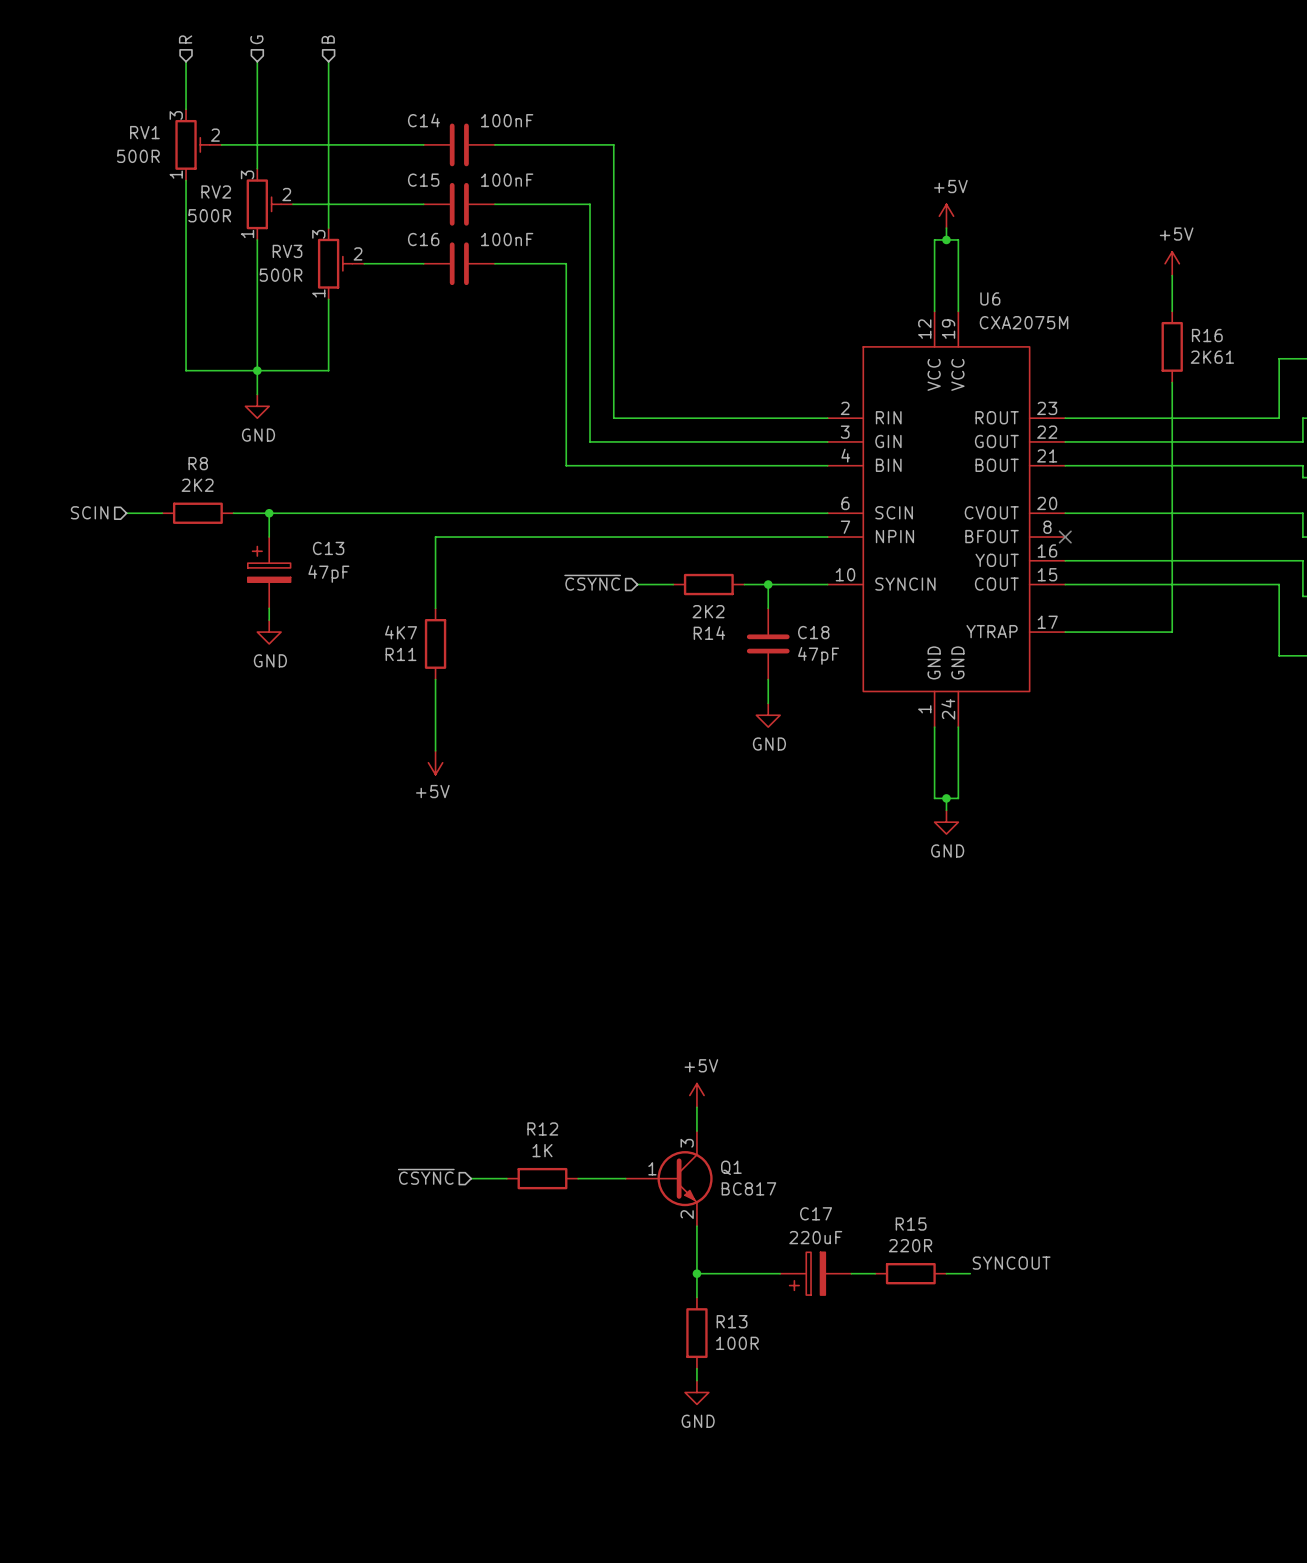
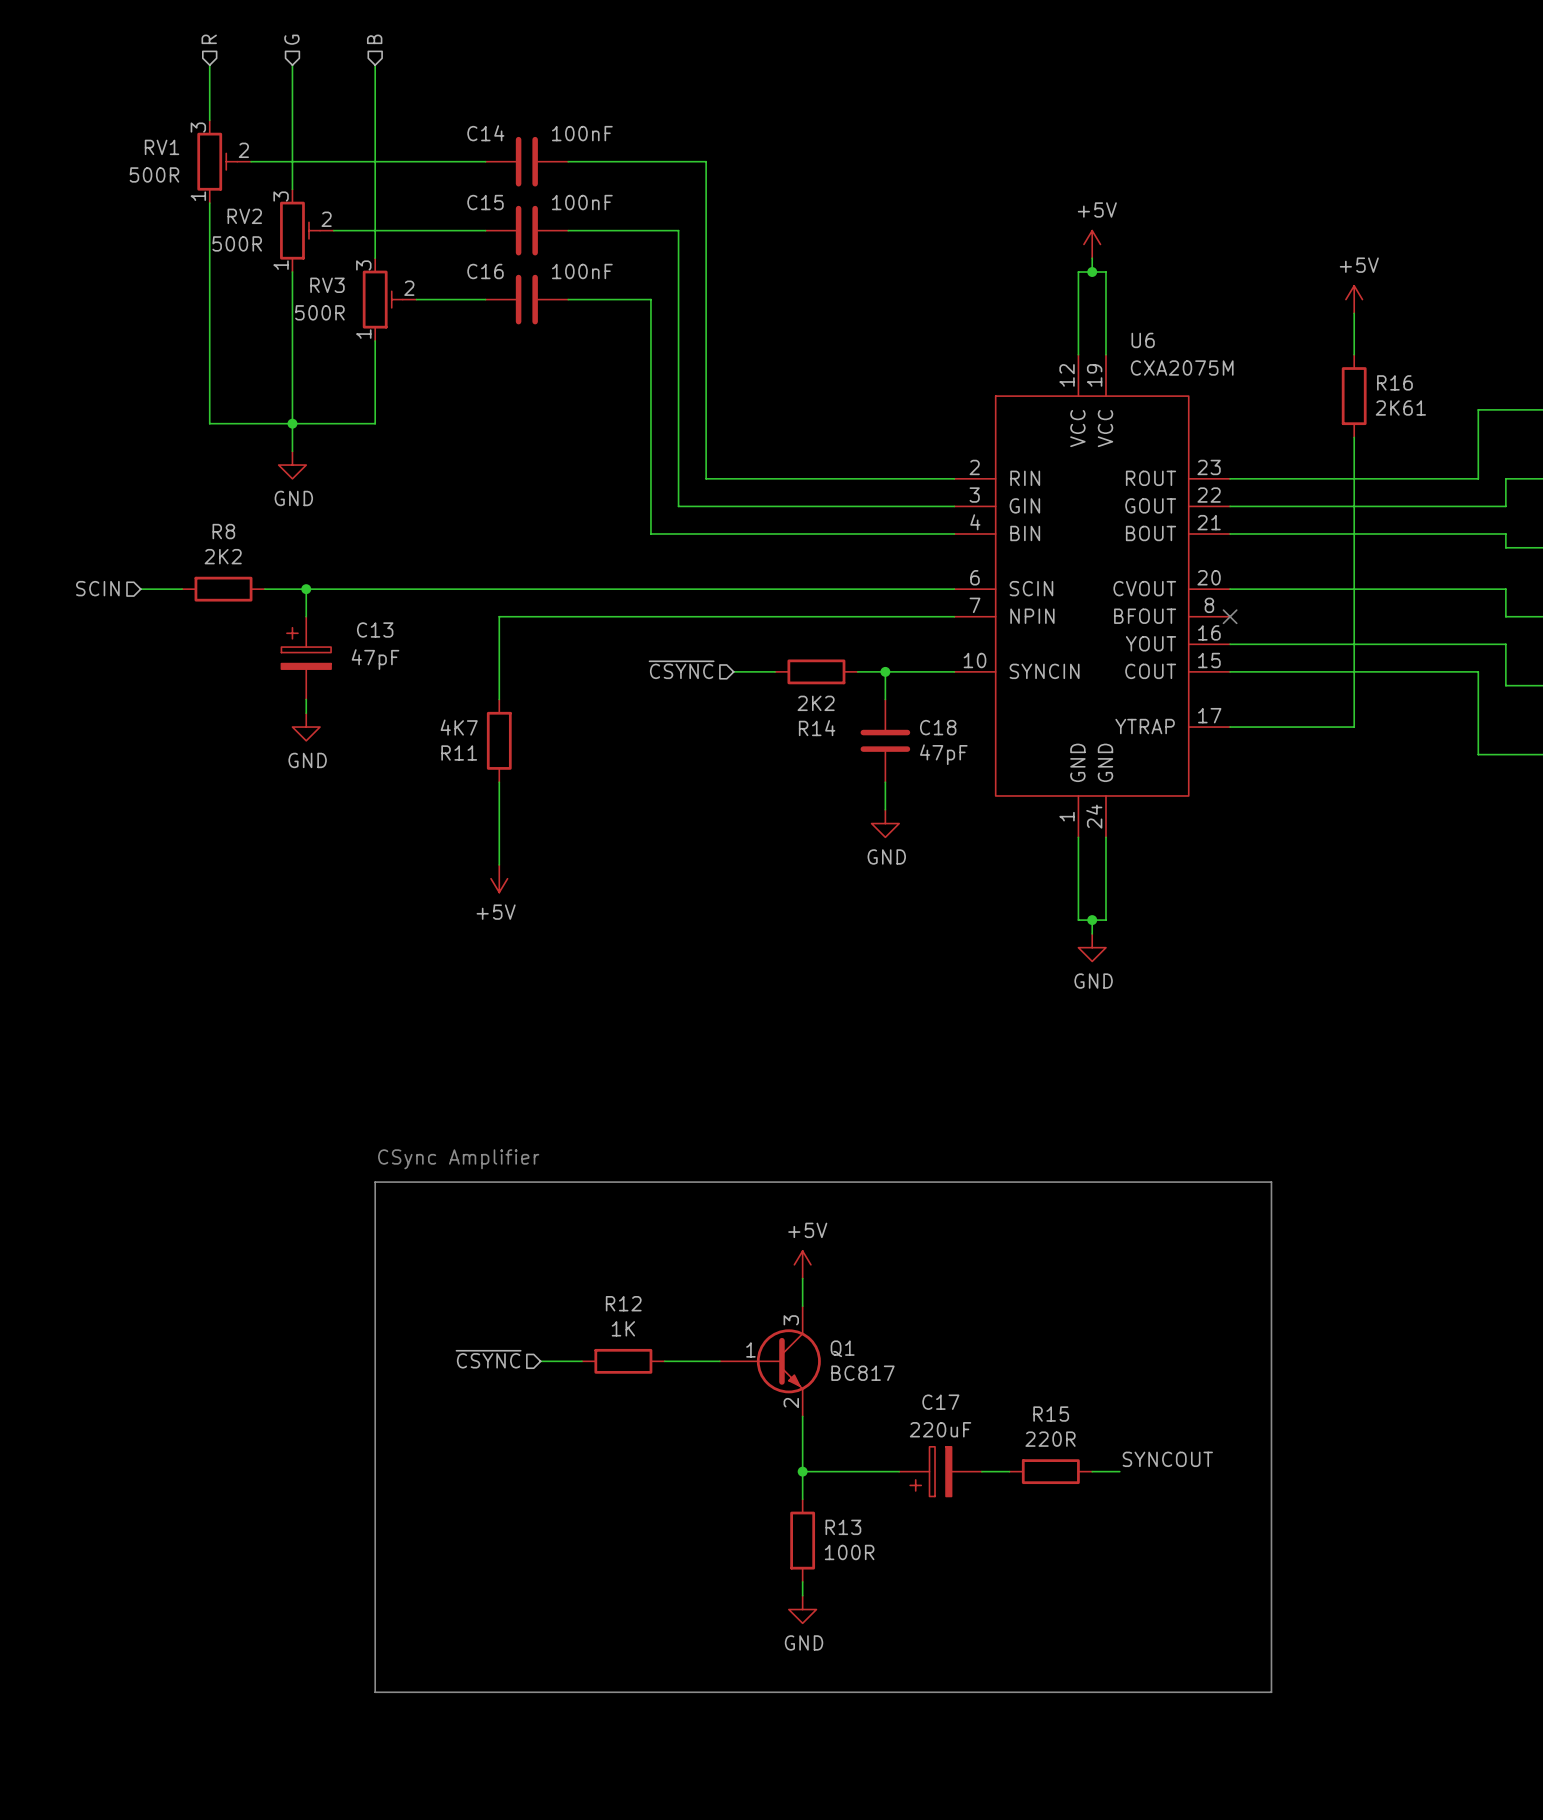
text: none -> CSync Amplifier (458, 1159)
line: none -> (375, 1182) (1271, 1182) (1271, 1692) (375, 1692) (375, 1182)

